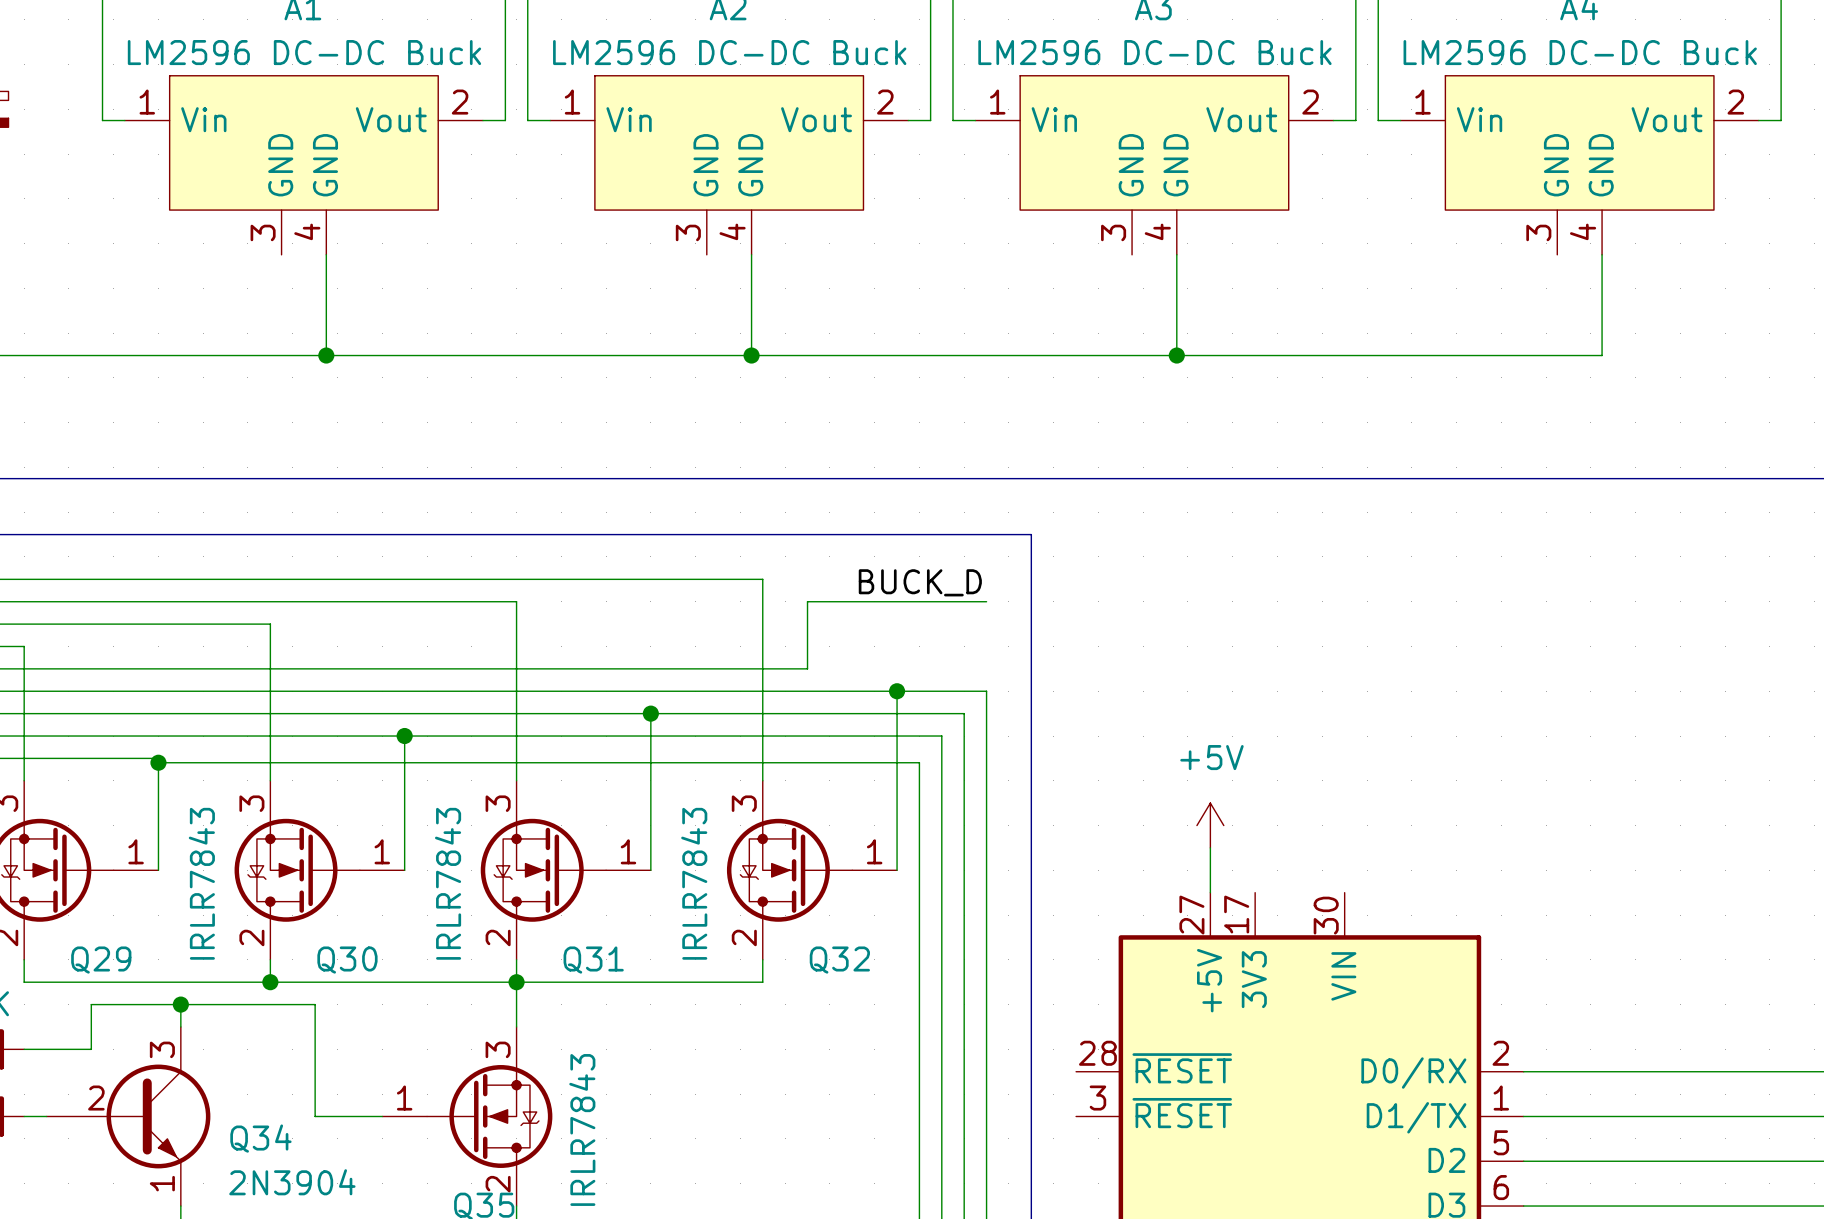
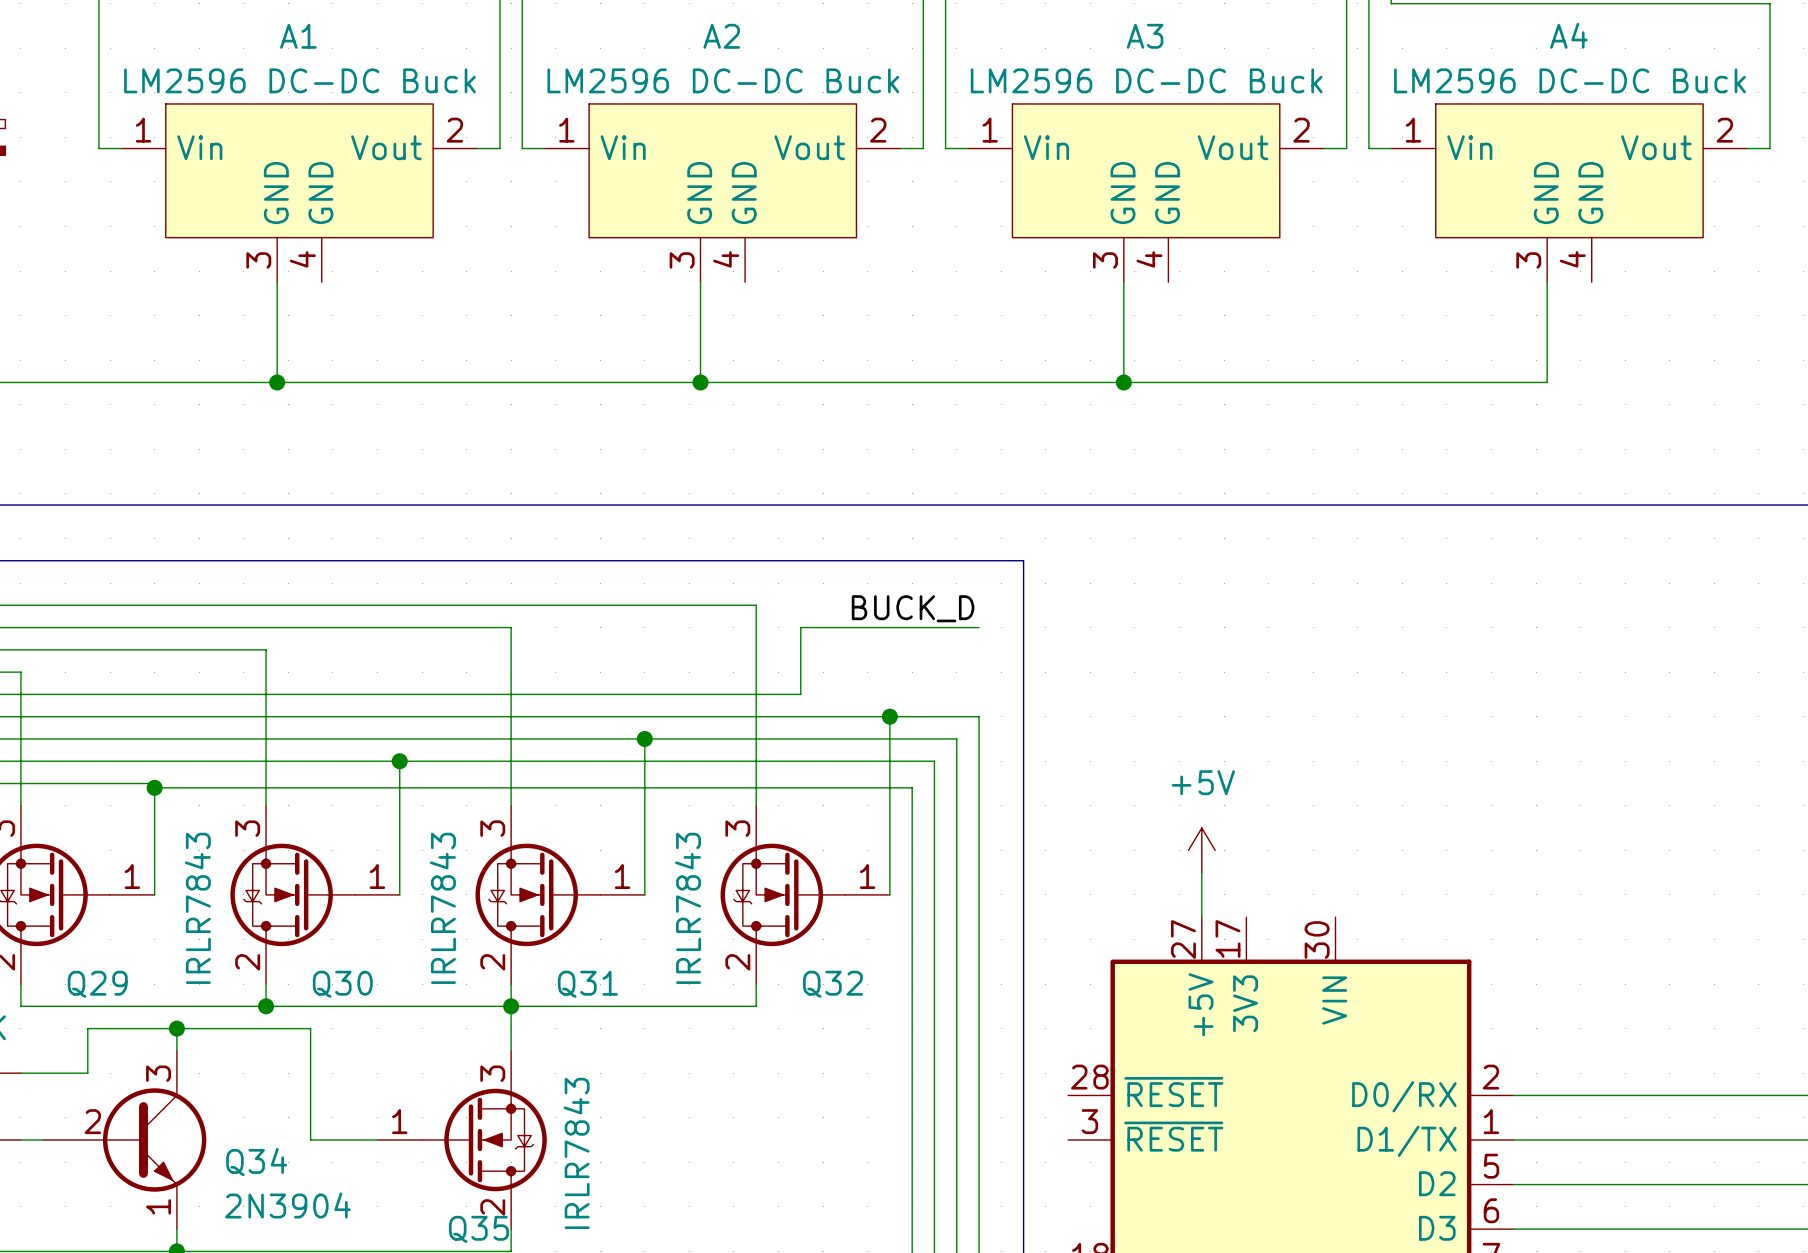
wire: (326, 254) (326, 355) -> (277, 282) (277, 382)
wire: (751, 254) (751, 355) -> (700, 282) (700, 382)
wire: (1176, 254) (1176, 355) -> (1123, 282) (1123, 382)
wire: (1602, 254) (1602, 355) (1557, 355) -> (1547, 282) (1547, 382)
junction position: (326, 355) -> (277, 382)
junction position: (751, 355) -> (700, 382)
junction position: (1176, 355) -> (1123, 382)

